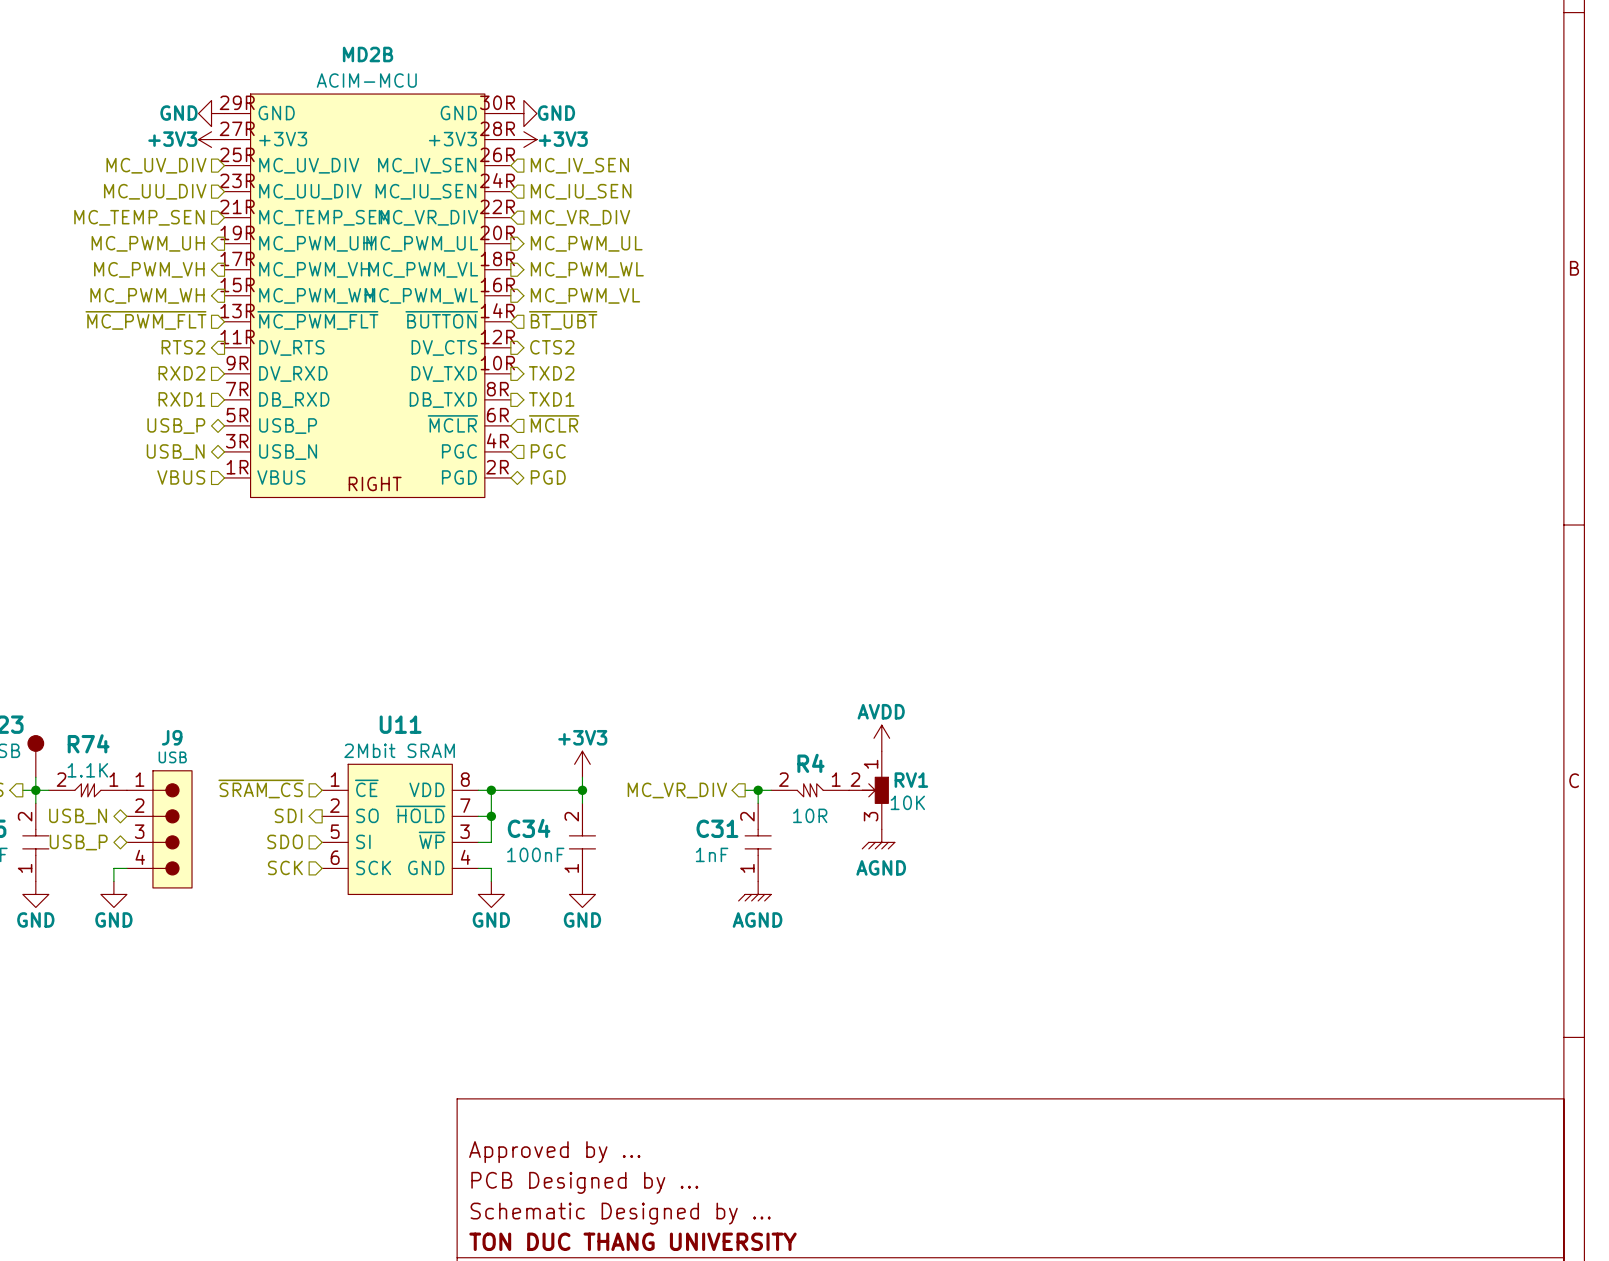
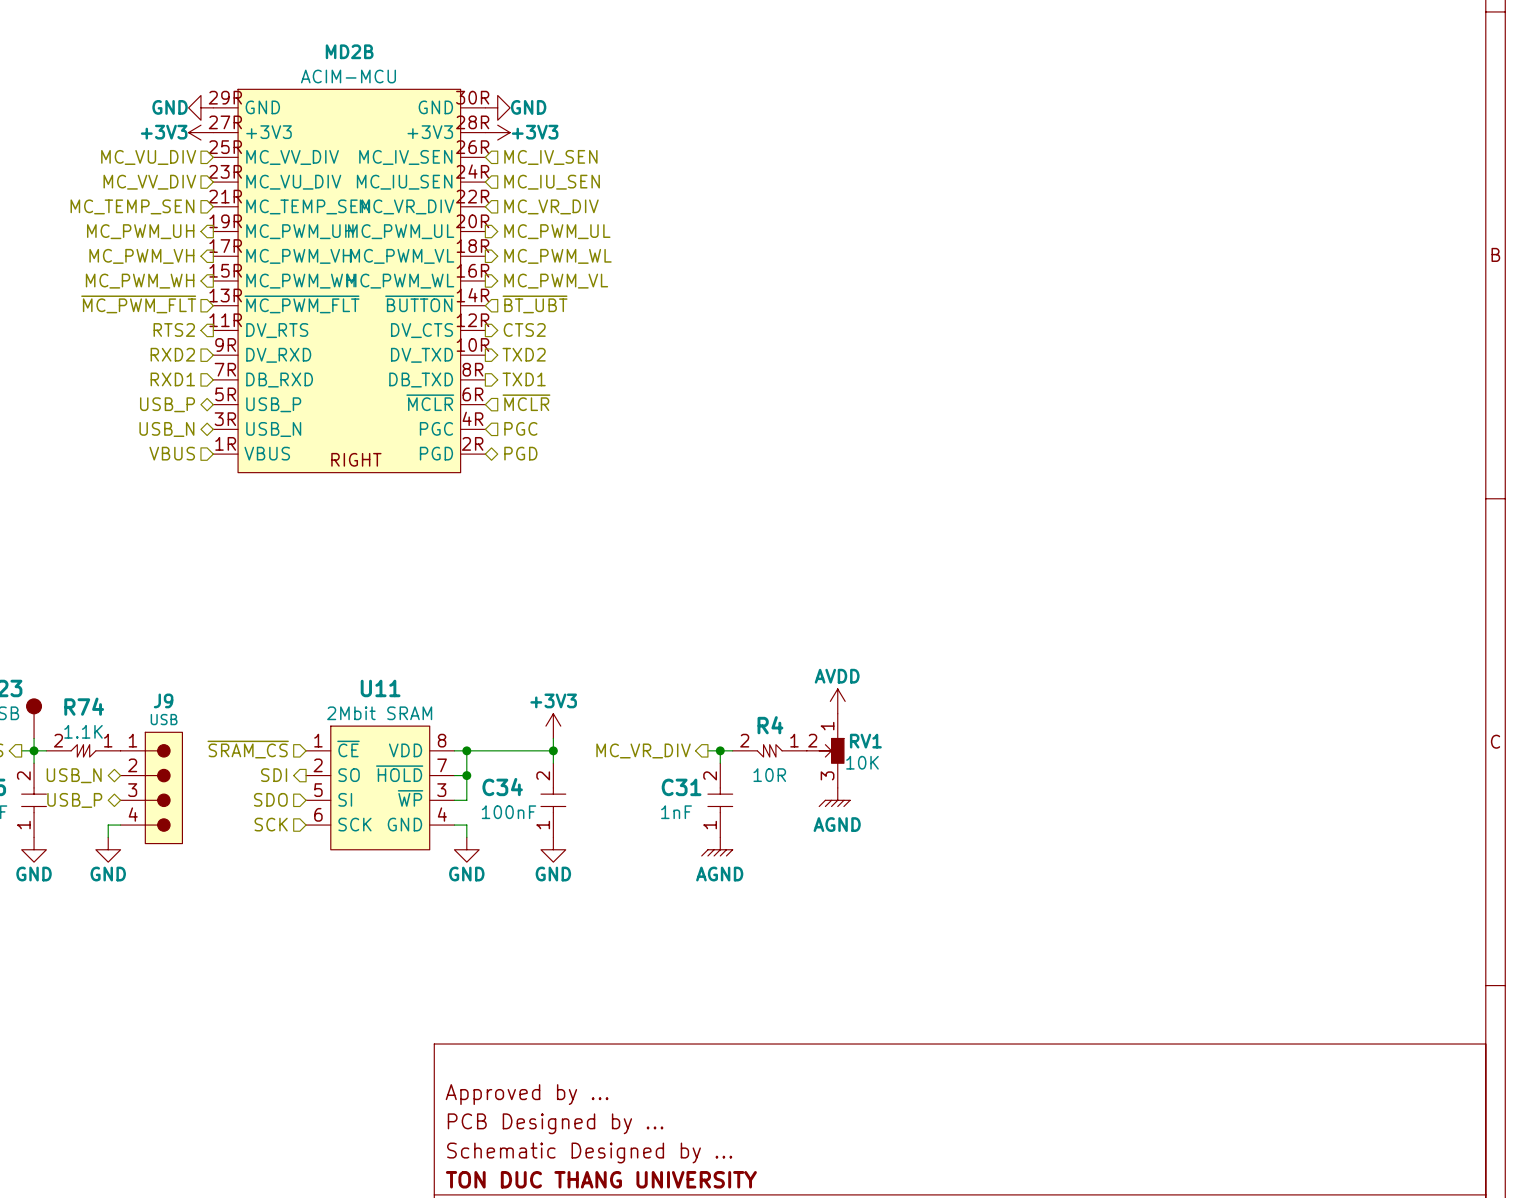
hierarchical label: MC_UV_DIV (156, 165) -> MC_VU_DIV (148, 157)
MD2B pin name: MC_UV_DIV (309, 165) -> MC_VV_DIV (292, 157)
hierarchical label: MC_UU_DIV (155, 191) -> MC_VV_DIV (149, 182)
MD2B pin name: MC_UU_DIV (310, 191) -> MC_VU_DIV (293, 182)

